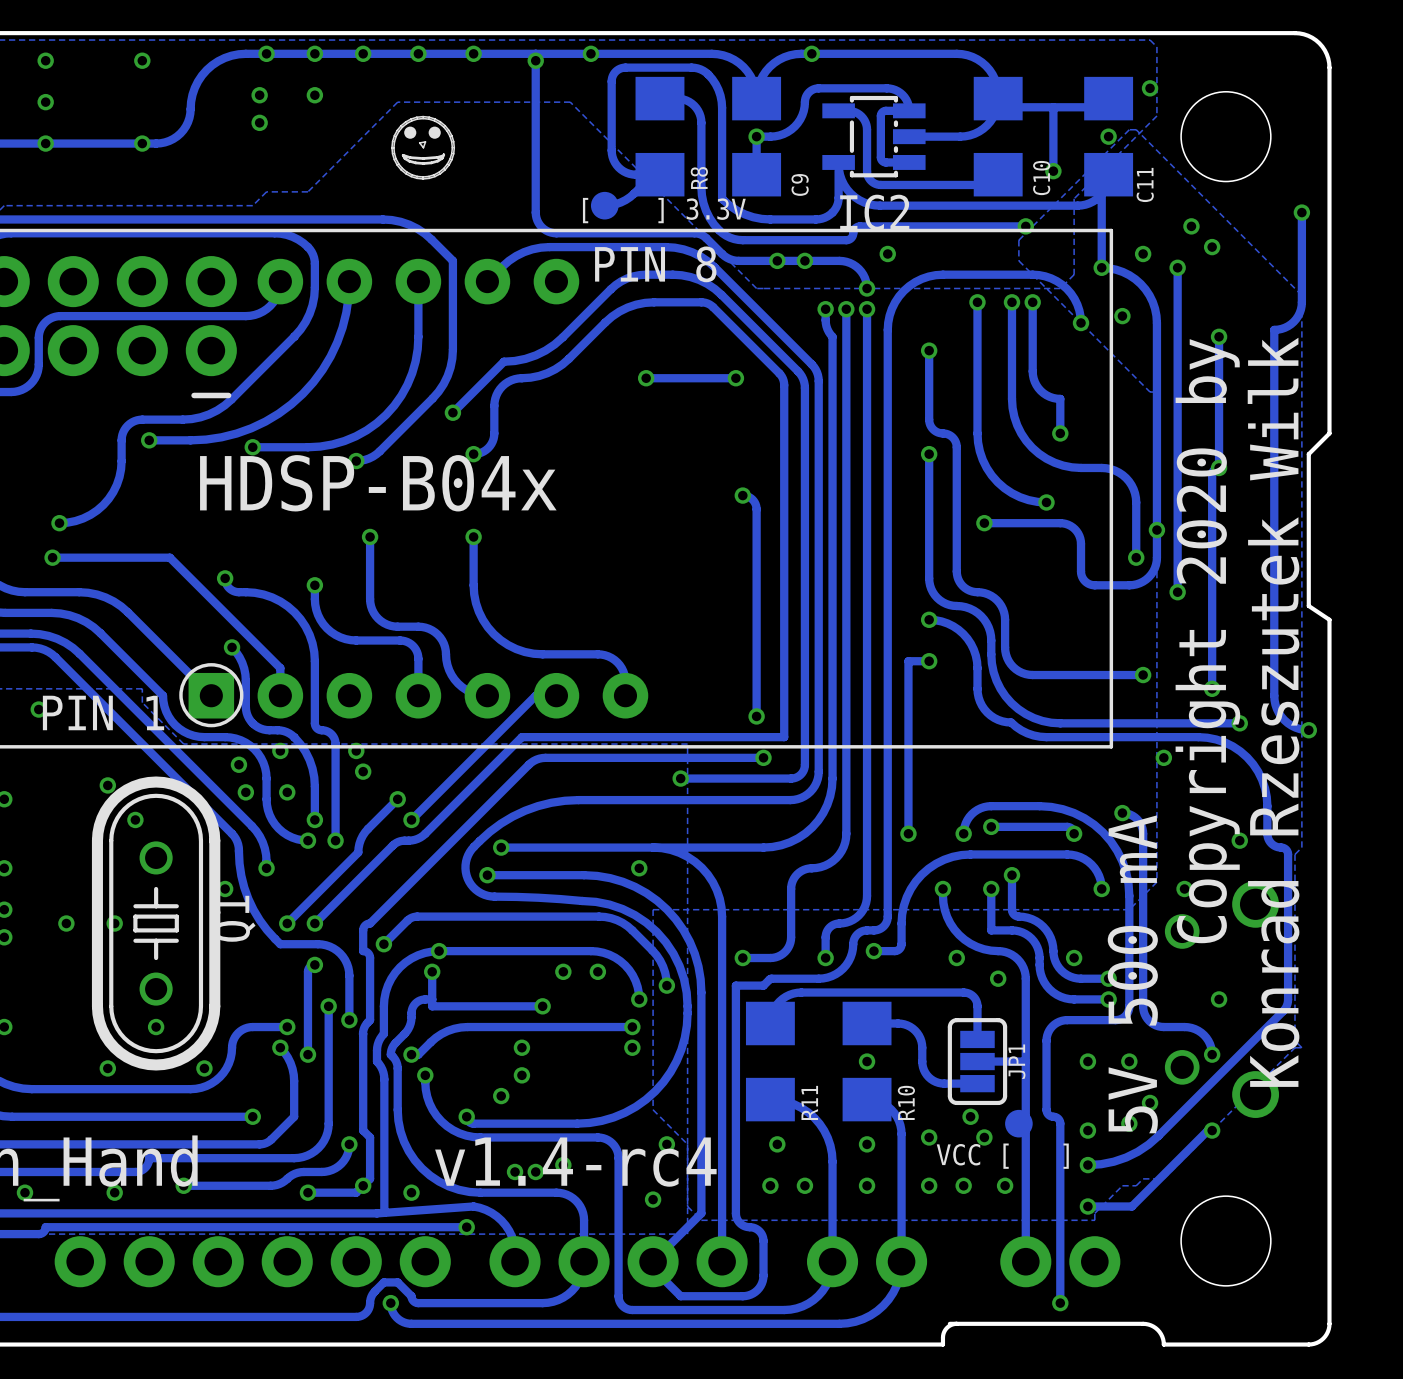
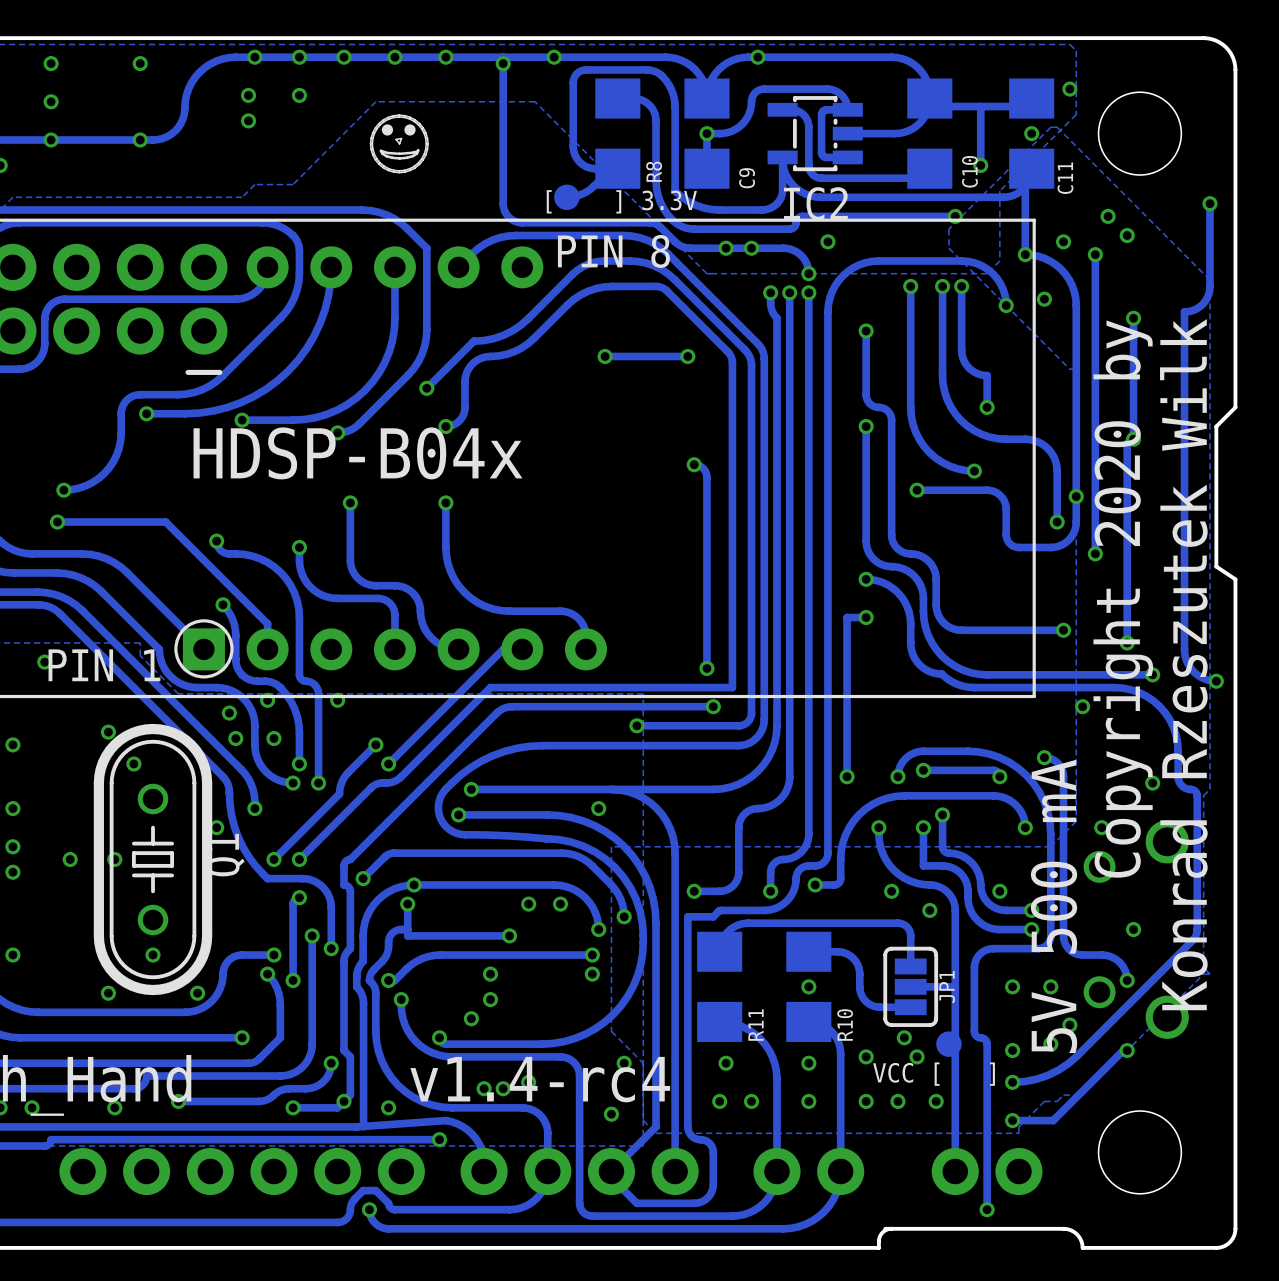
via: (363, 771) -> none

